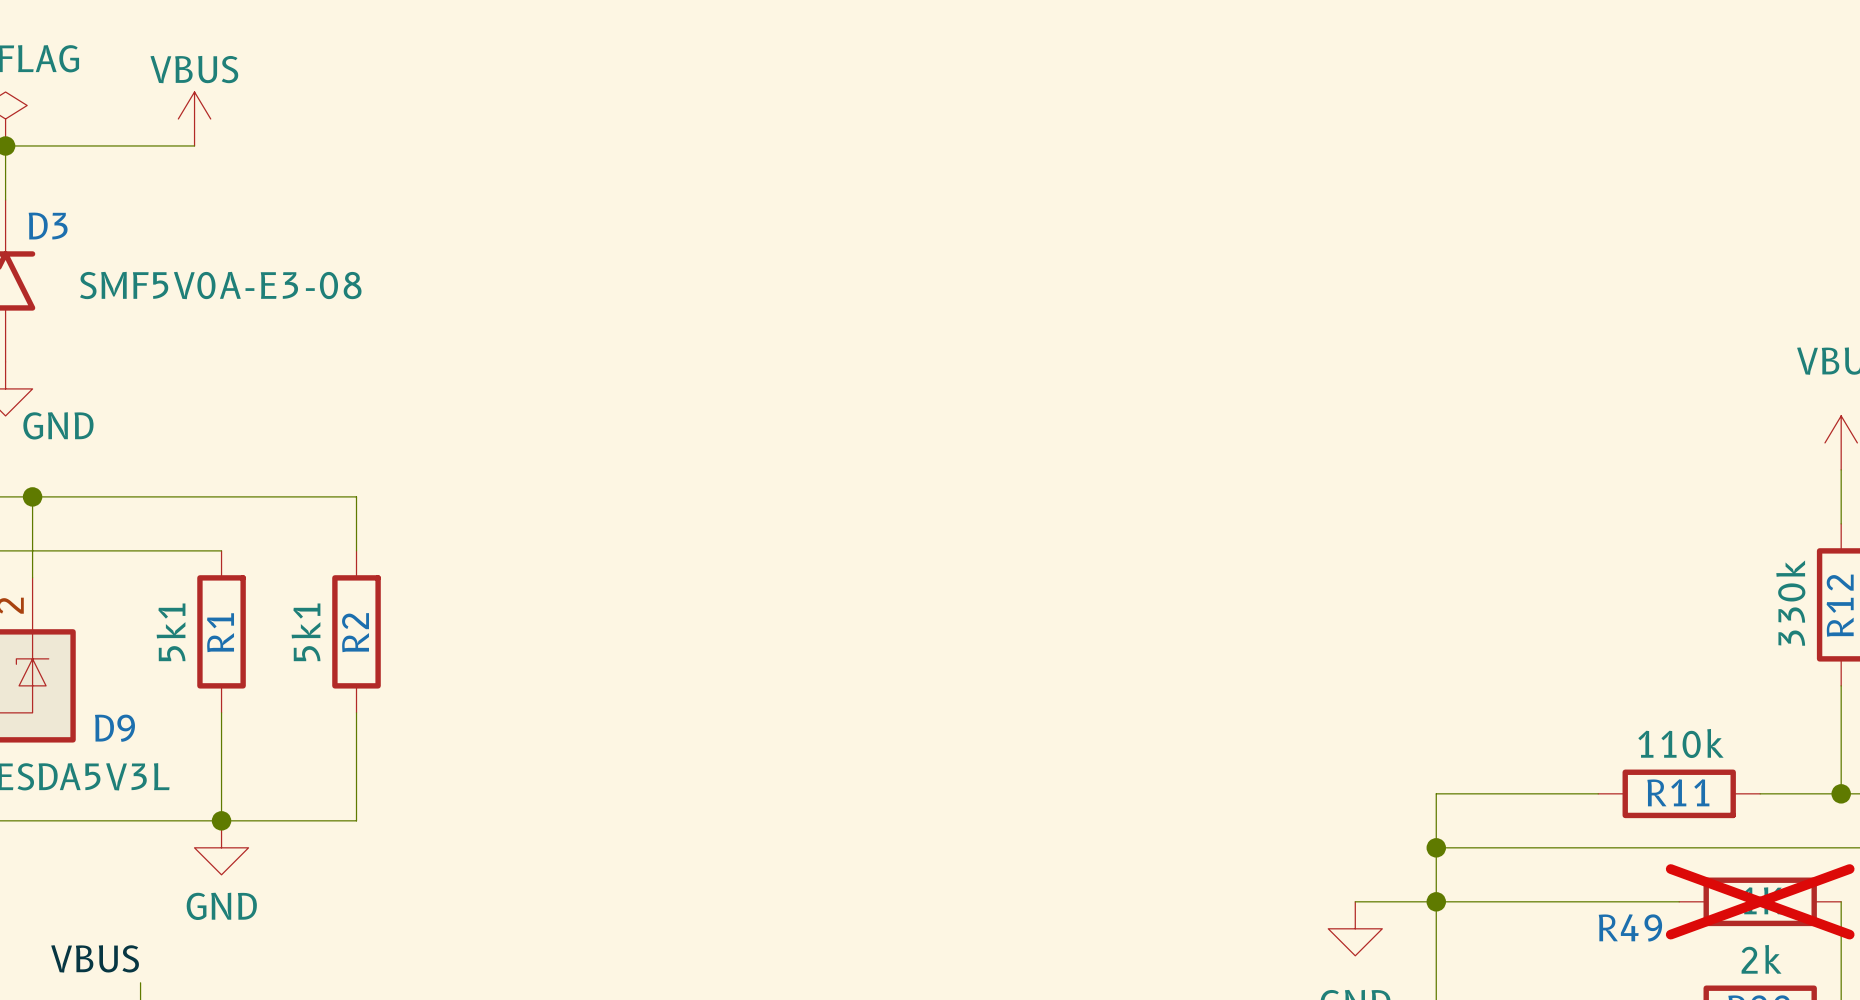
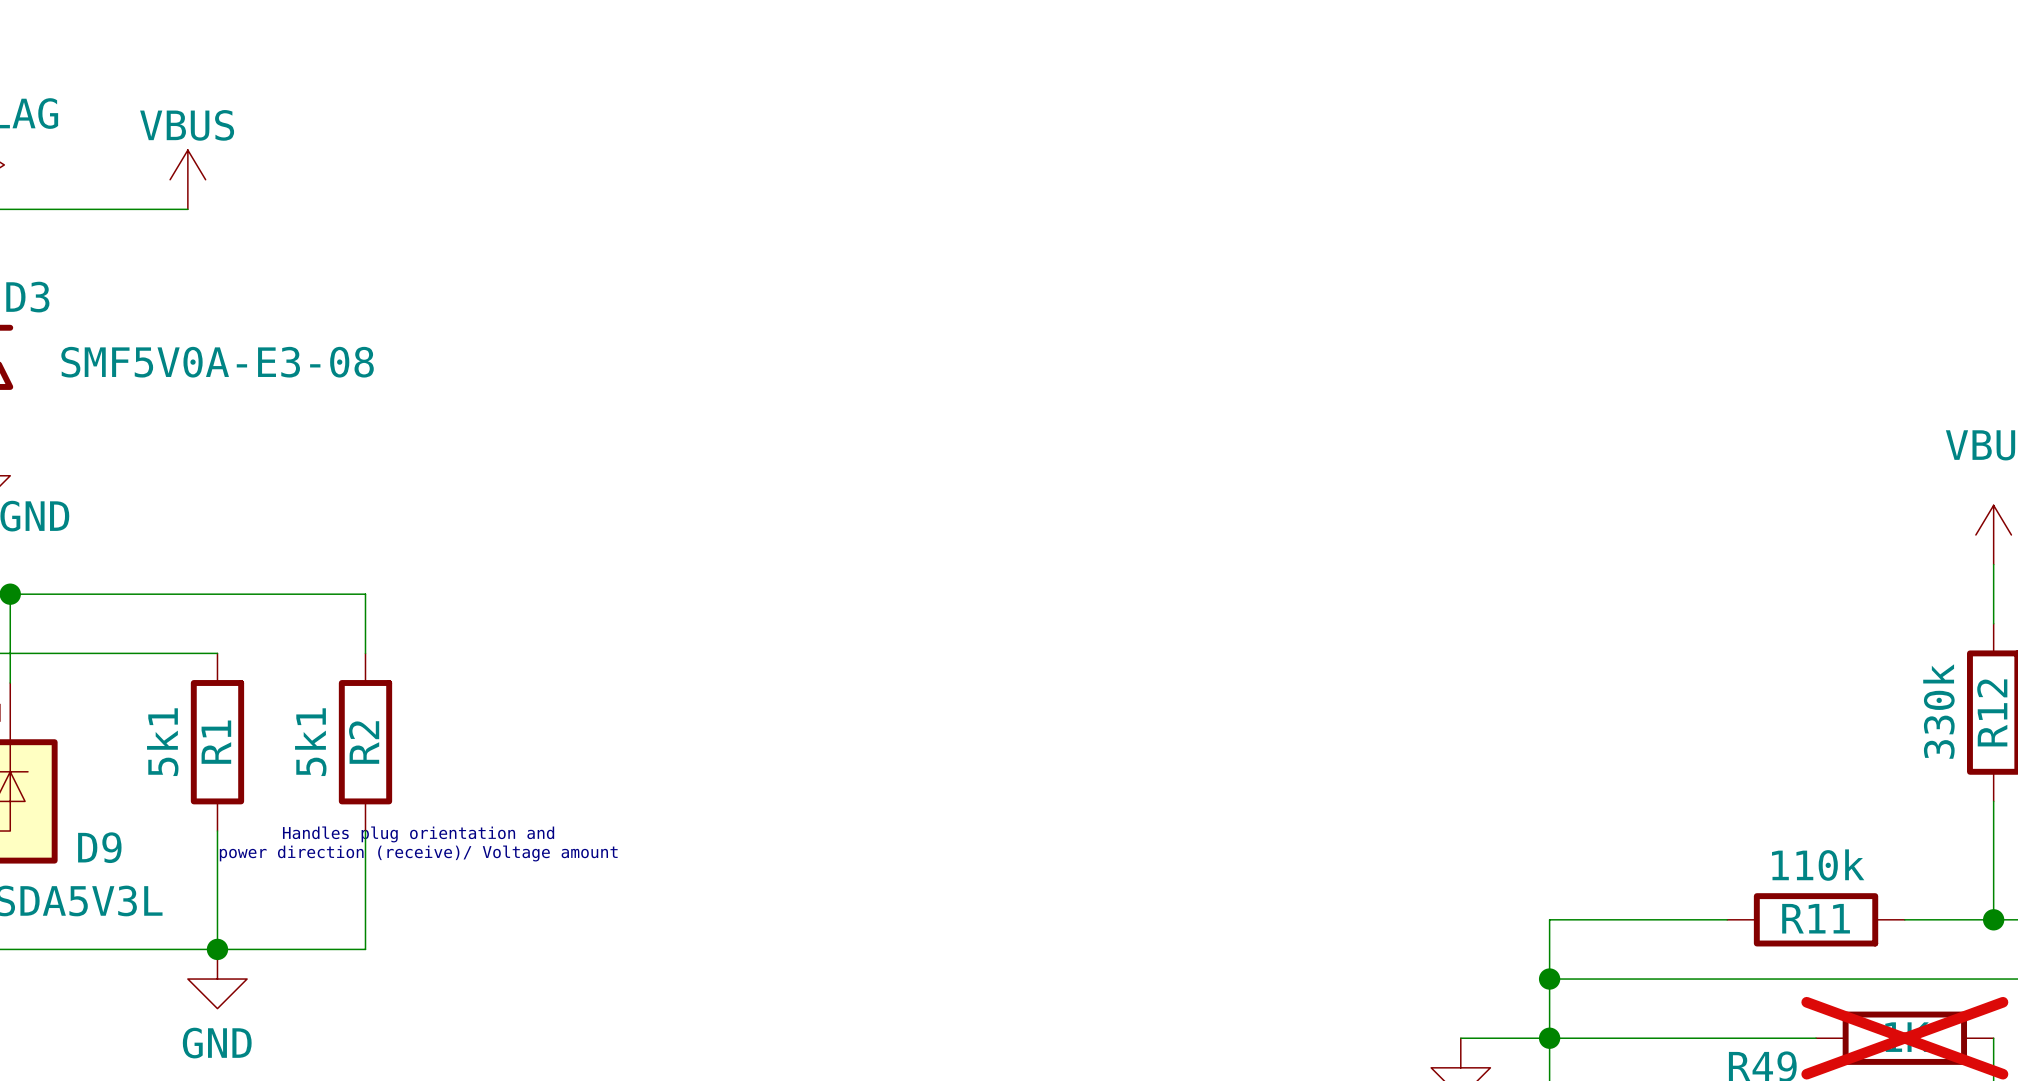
text: none -> Handles plug orientation and (418, 834)
text: none -> power direction (receive)/ Voltage amount (418, 853)

